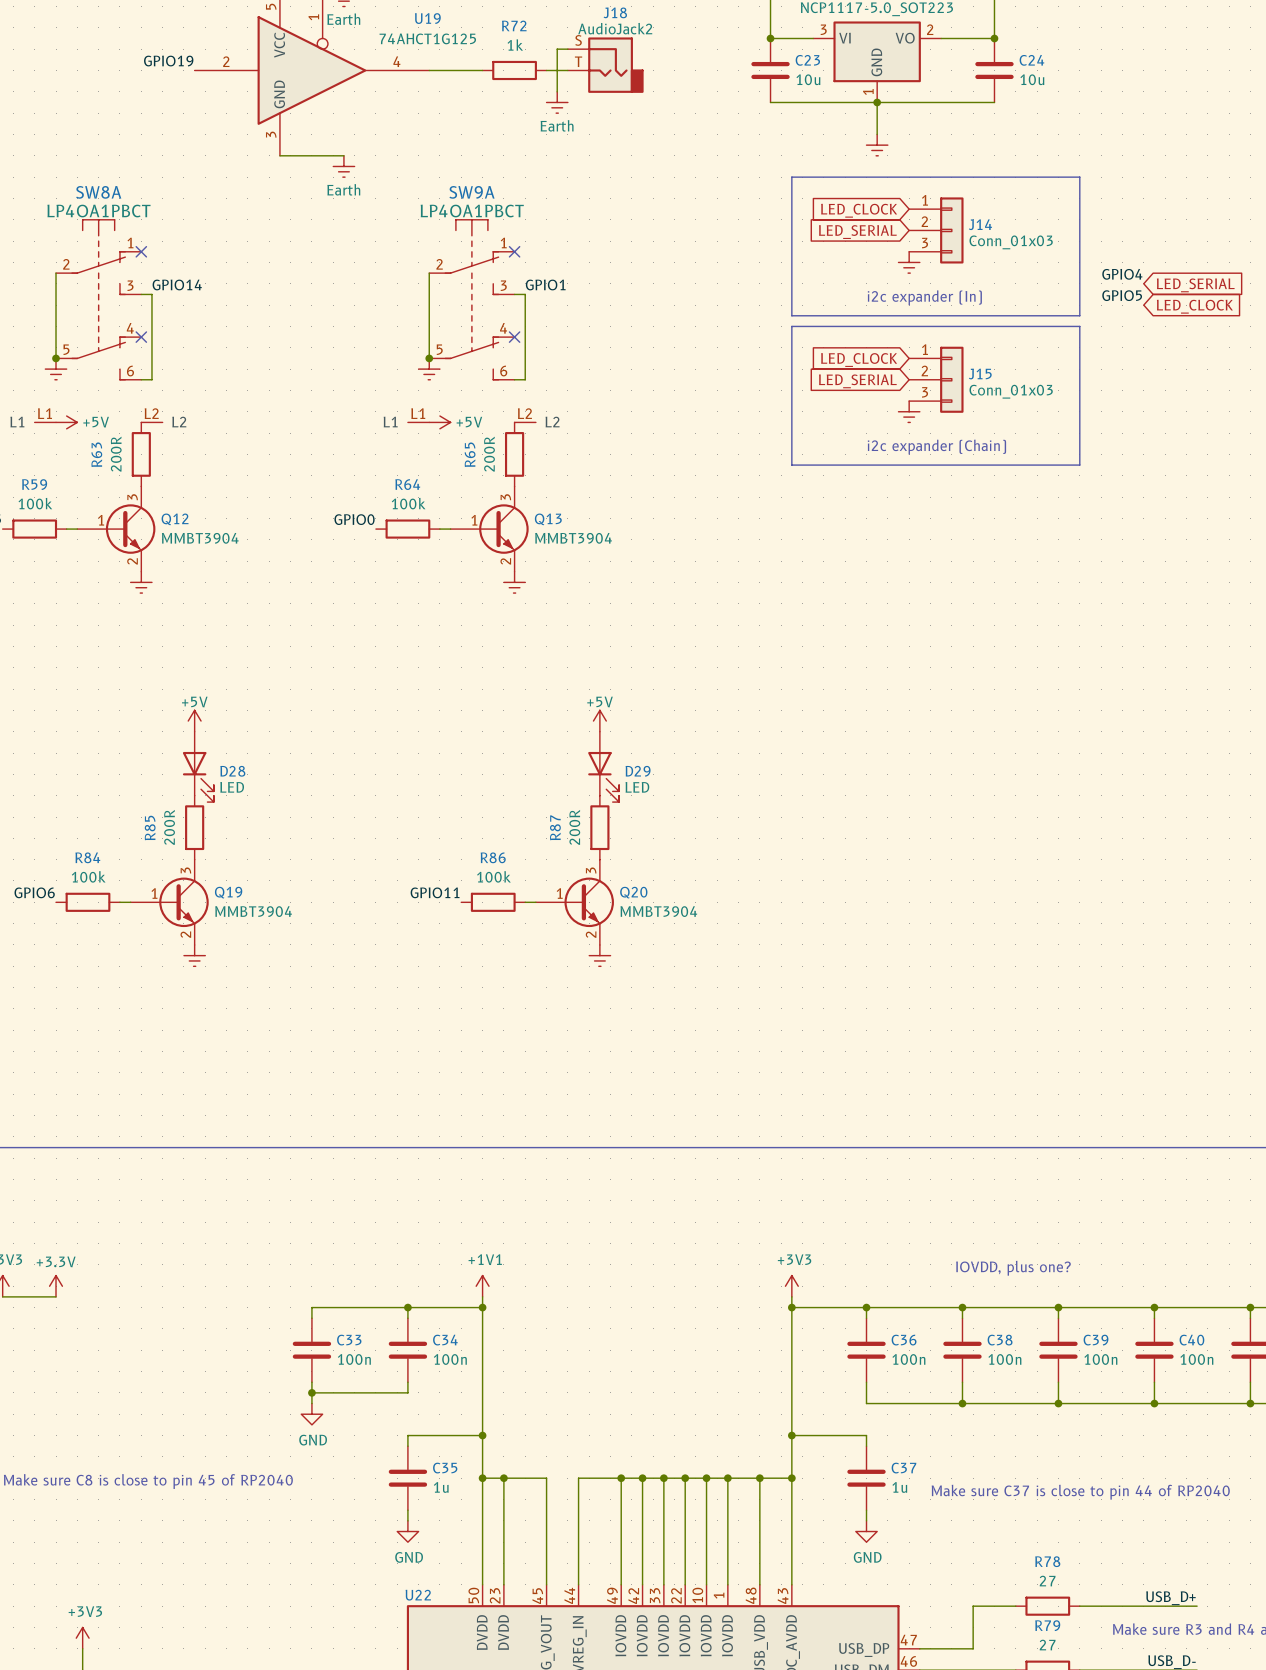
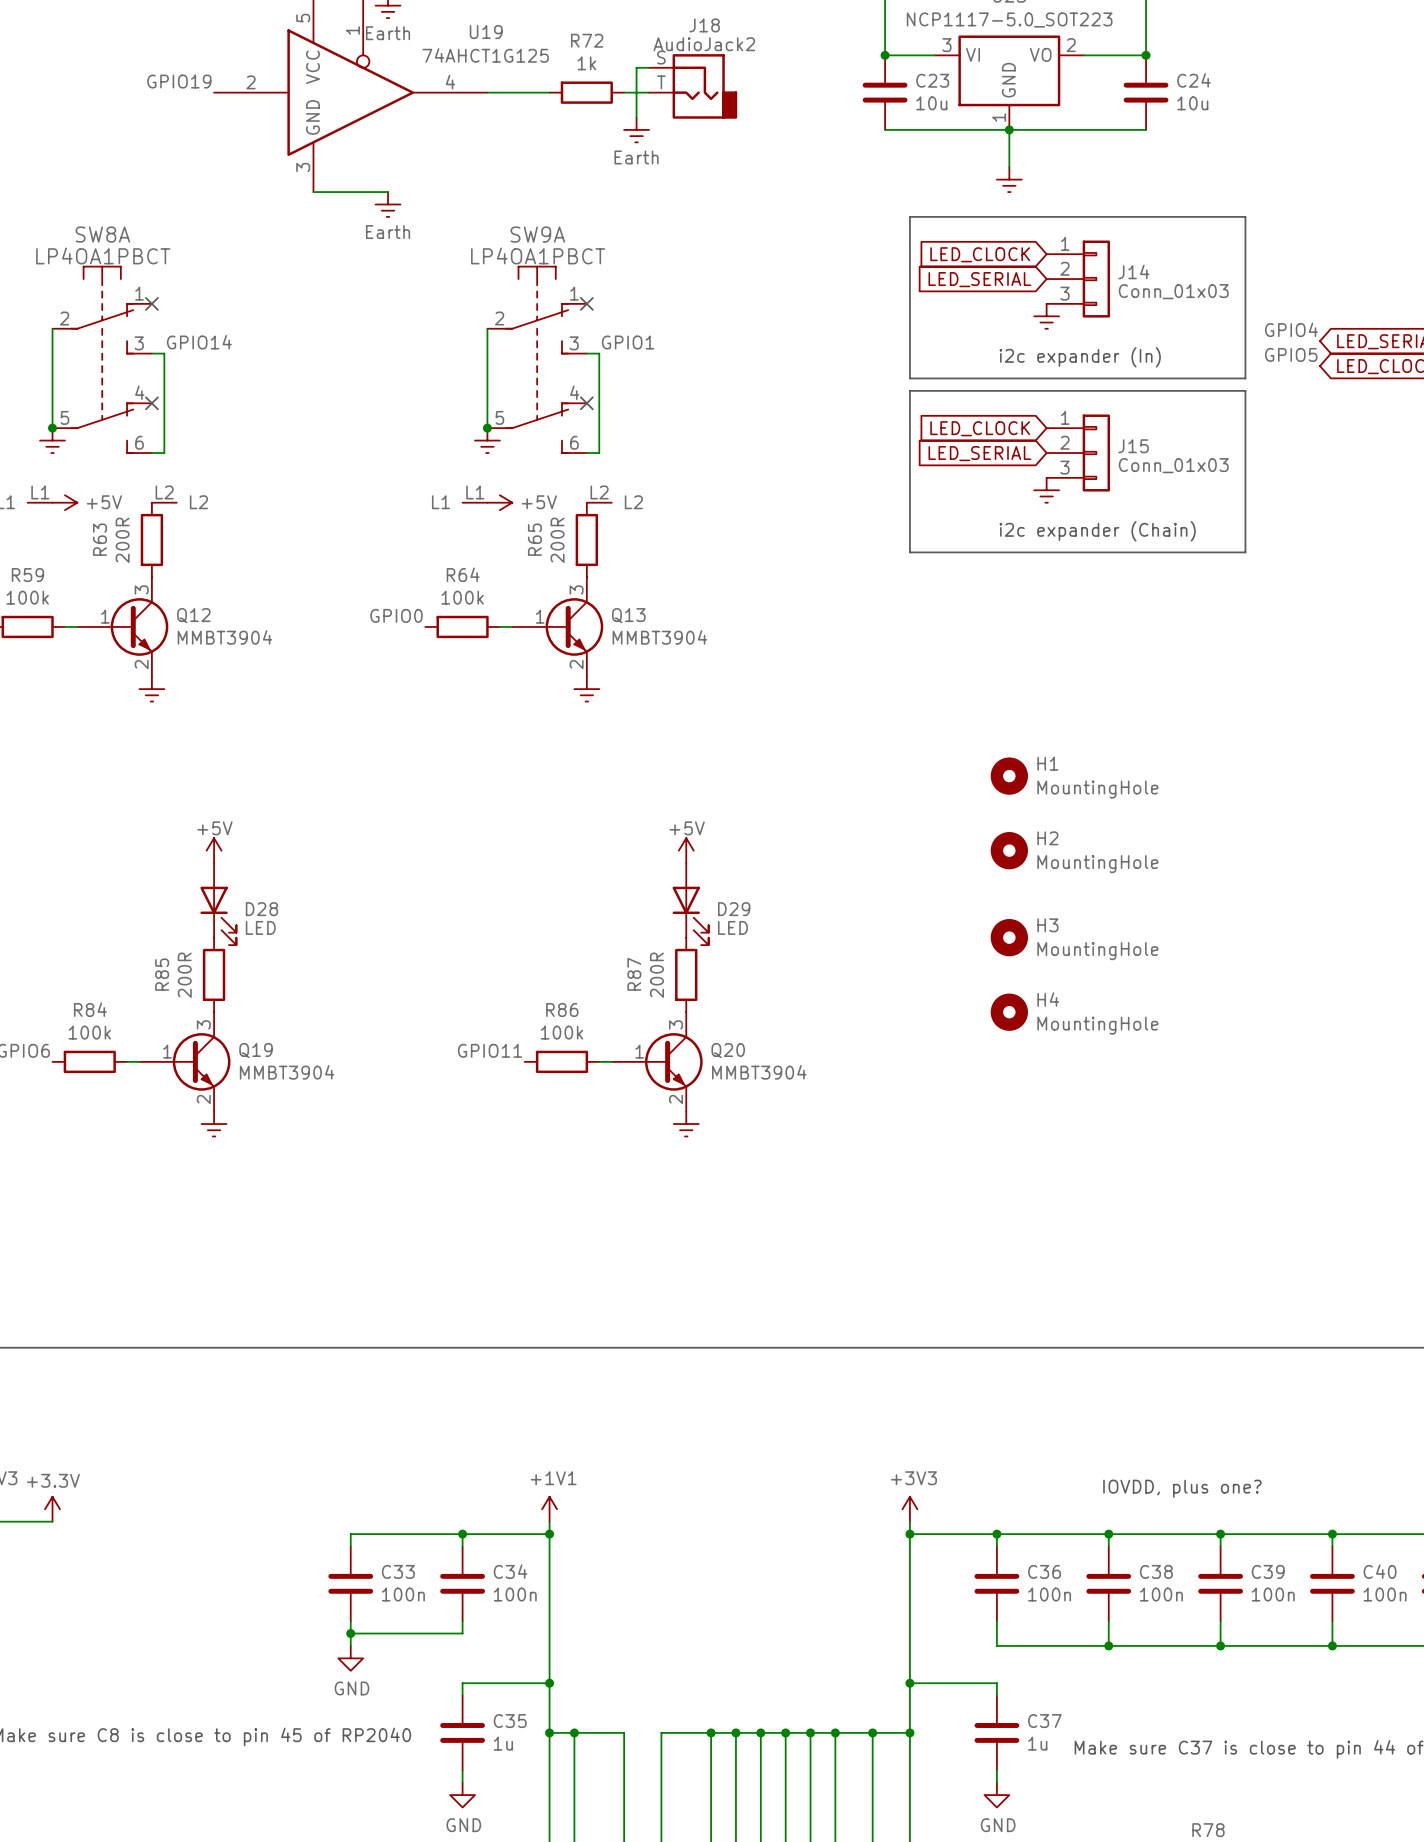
H1: none -> MountingHole (1009, 776)
H2: none -> MountingHole (1009, 850)
H3: none -> MountingHole (1009, 937)
H4: none -> MountingHole (1009, 1012)

